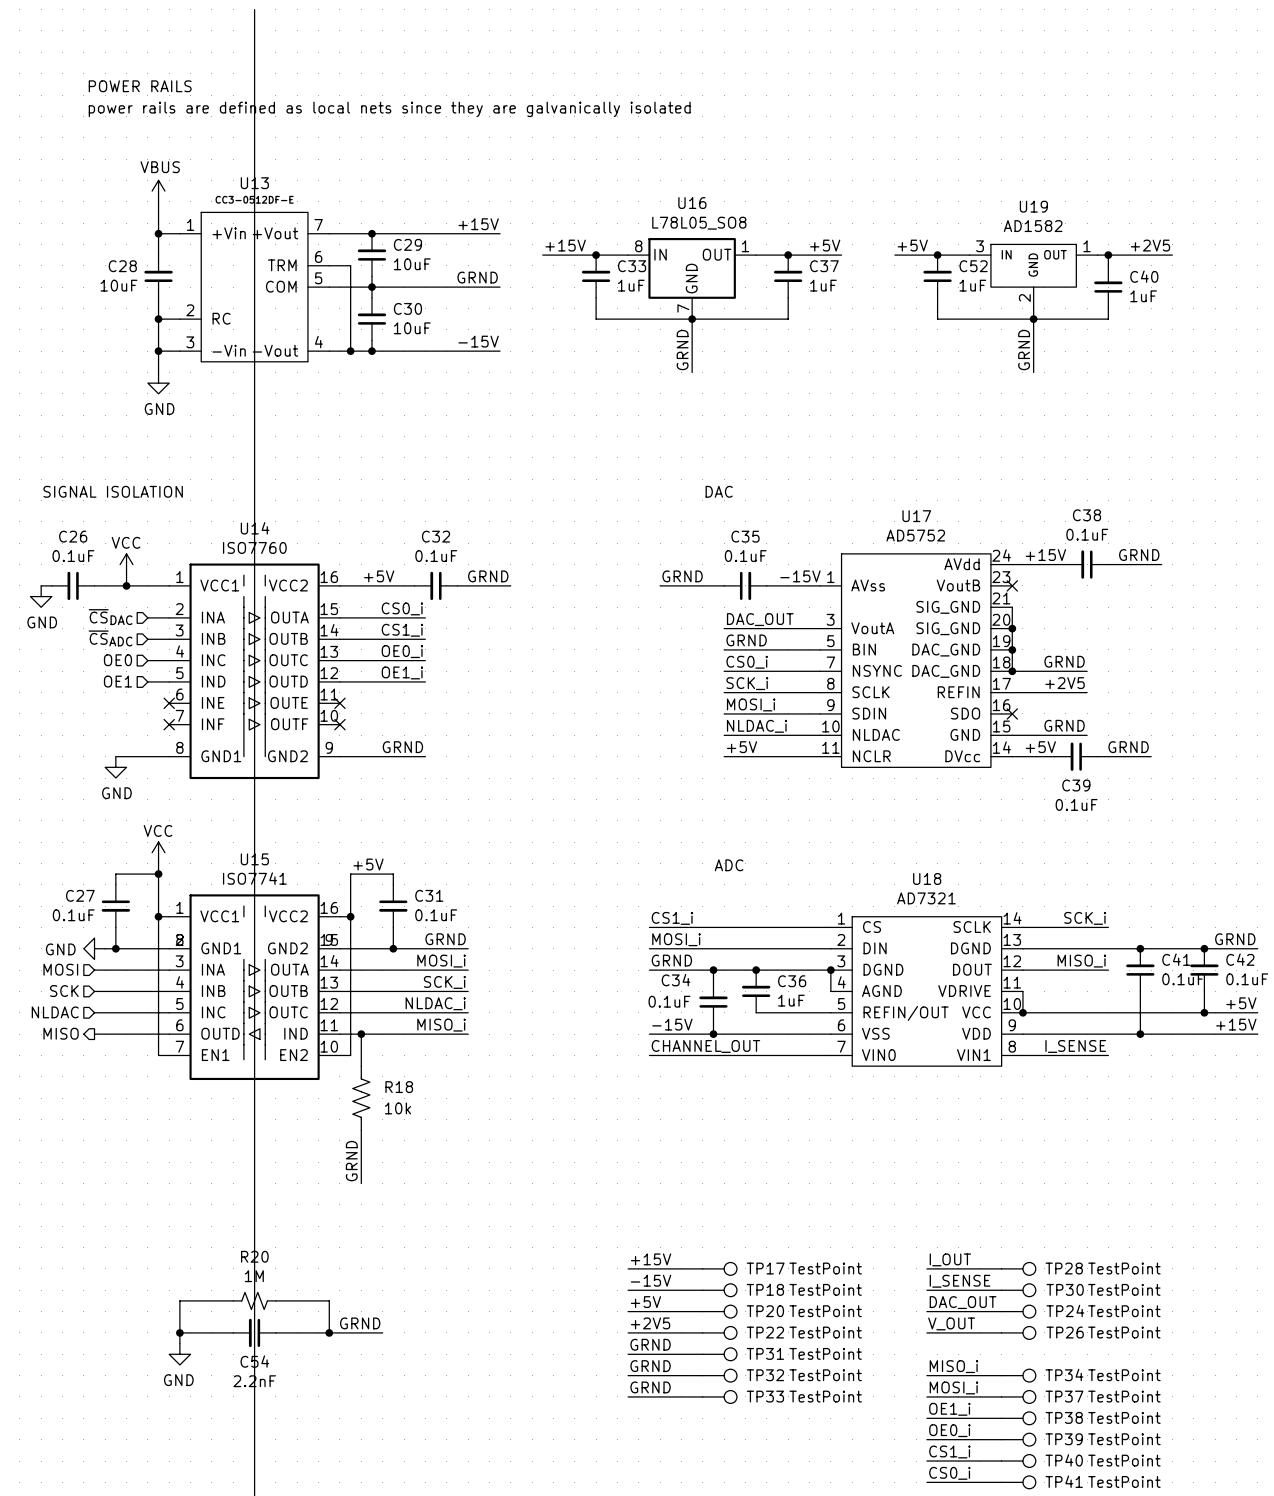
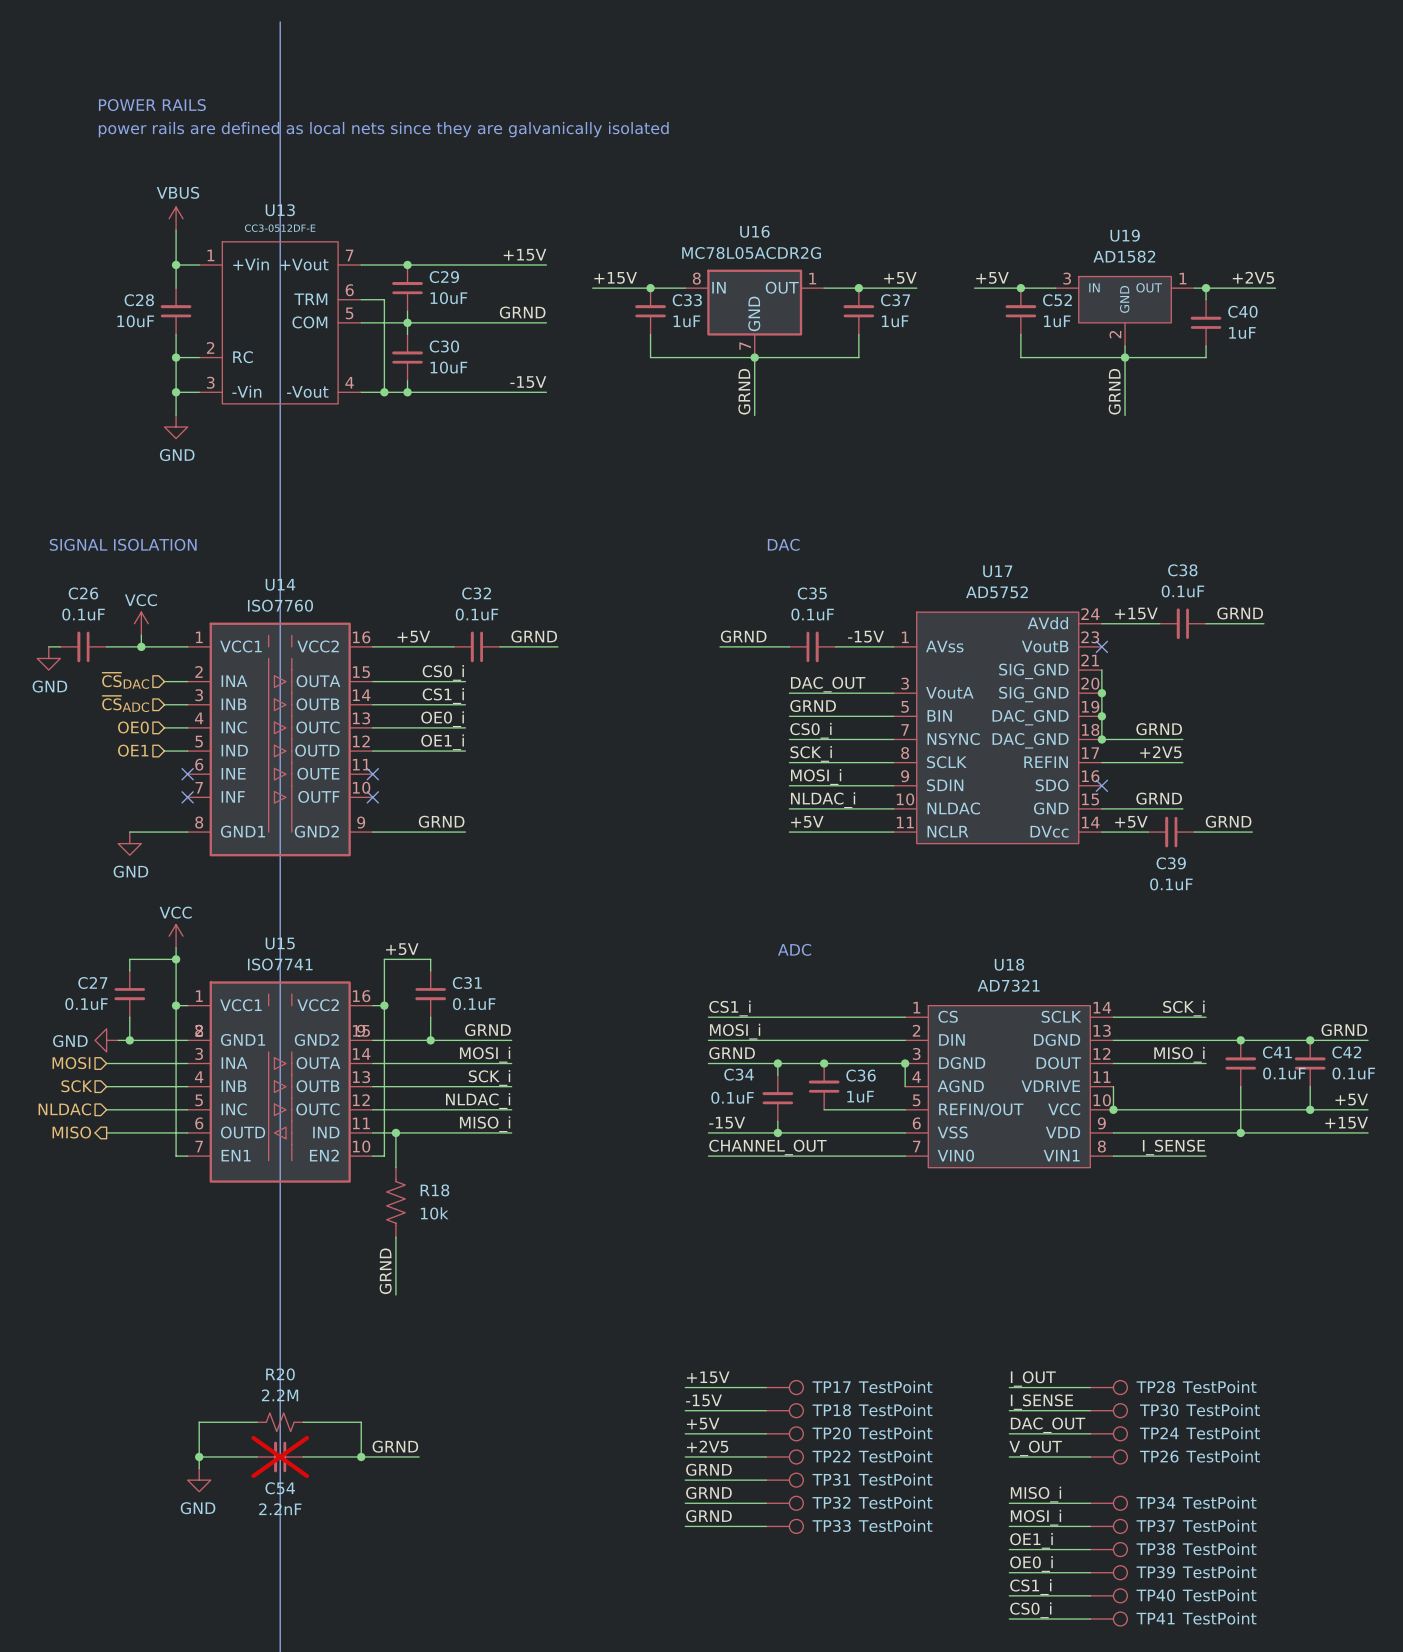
U16 value: L78L05_SO8 (699, 223) -> MC78L05ACDR2G (751, 253)
R20 value: 1M (254, 1276) -> 2.2M (280, 1395)
C54 do-not-place cross: none -> (280, 1456)

